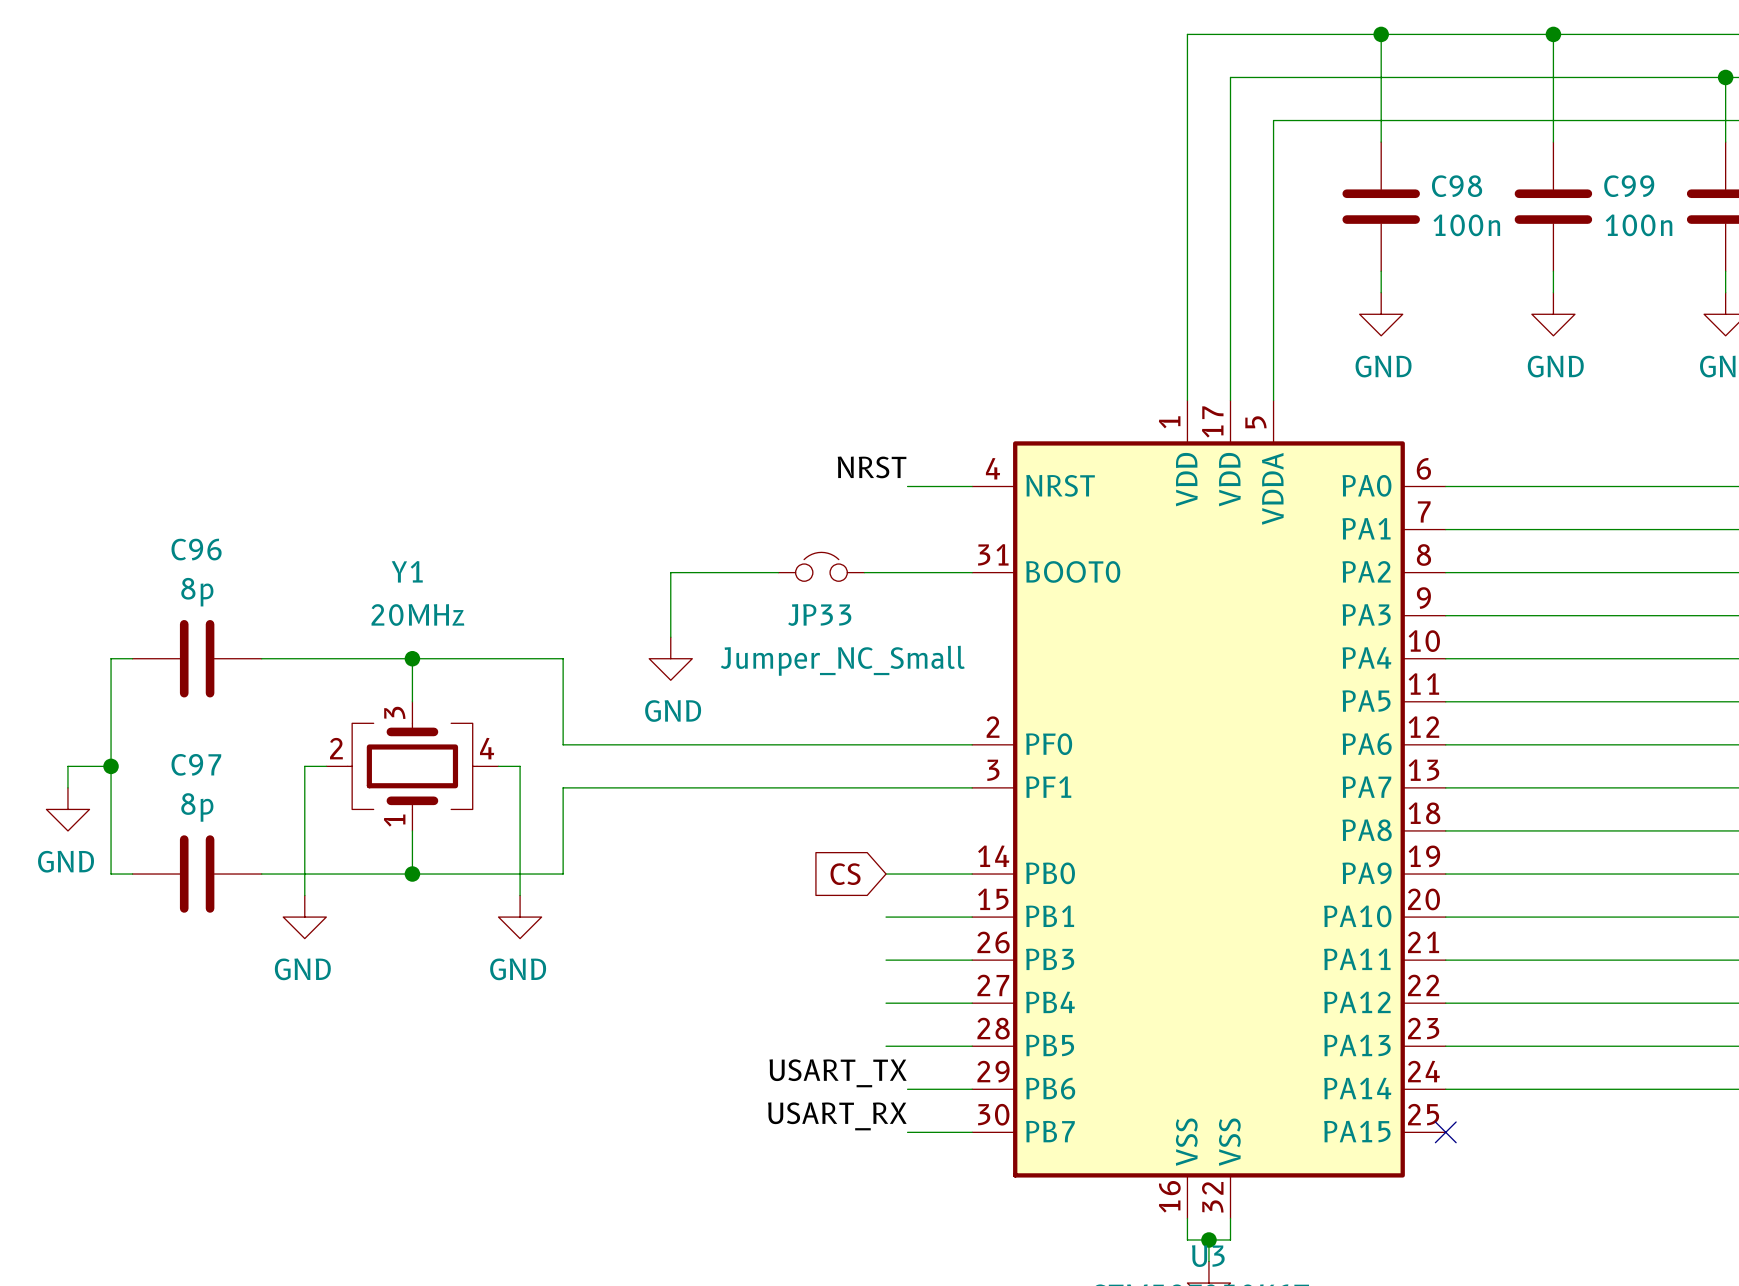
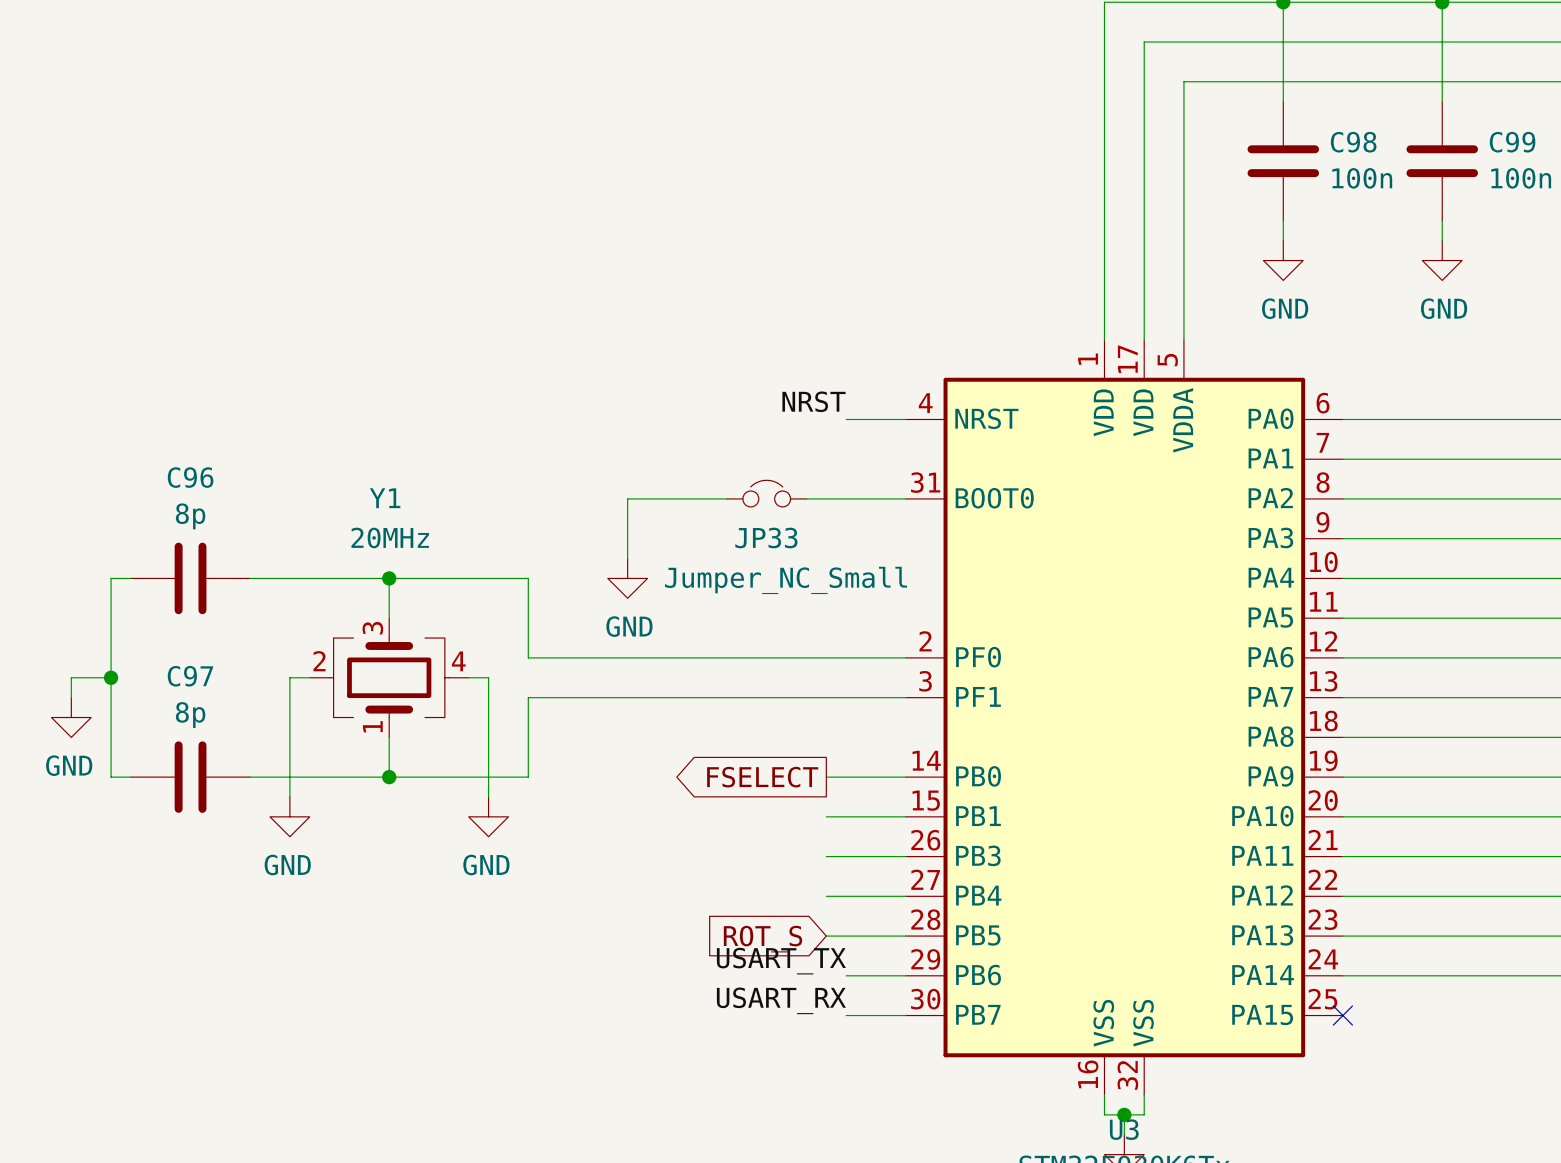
global label shape: input (845, 874) -> output (762, 777)
global label: CS (845, 874) -> FSELECT (762, 777)
global label: none -> ROT_S (763, 939)

